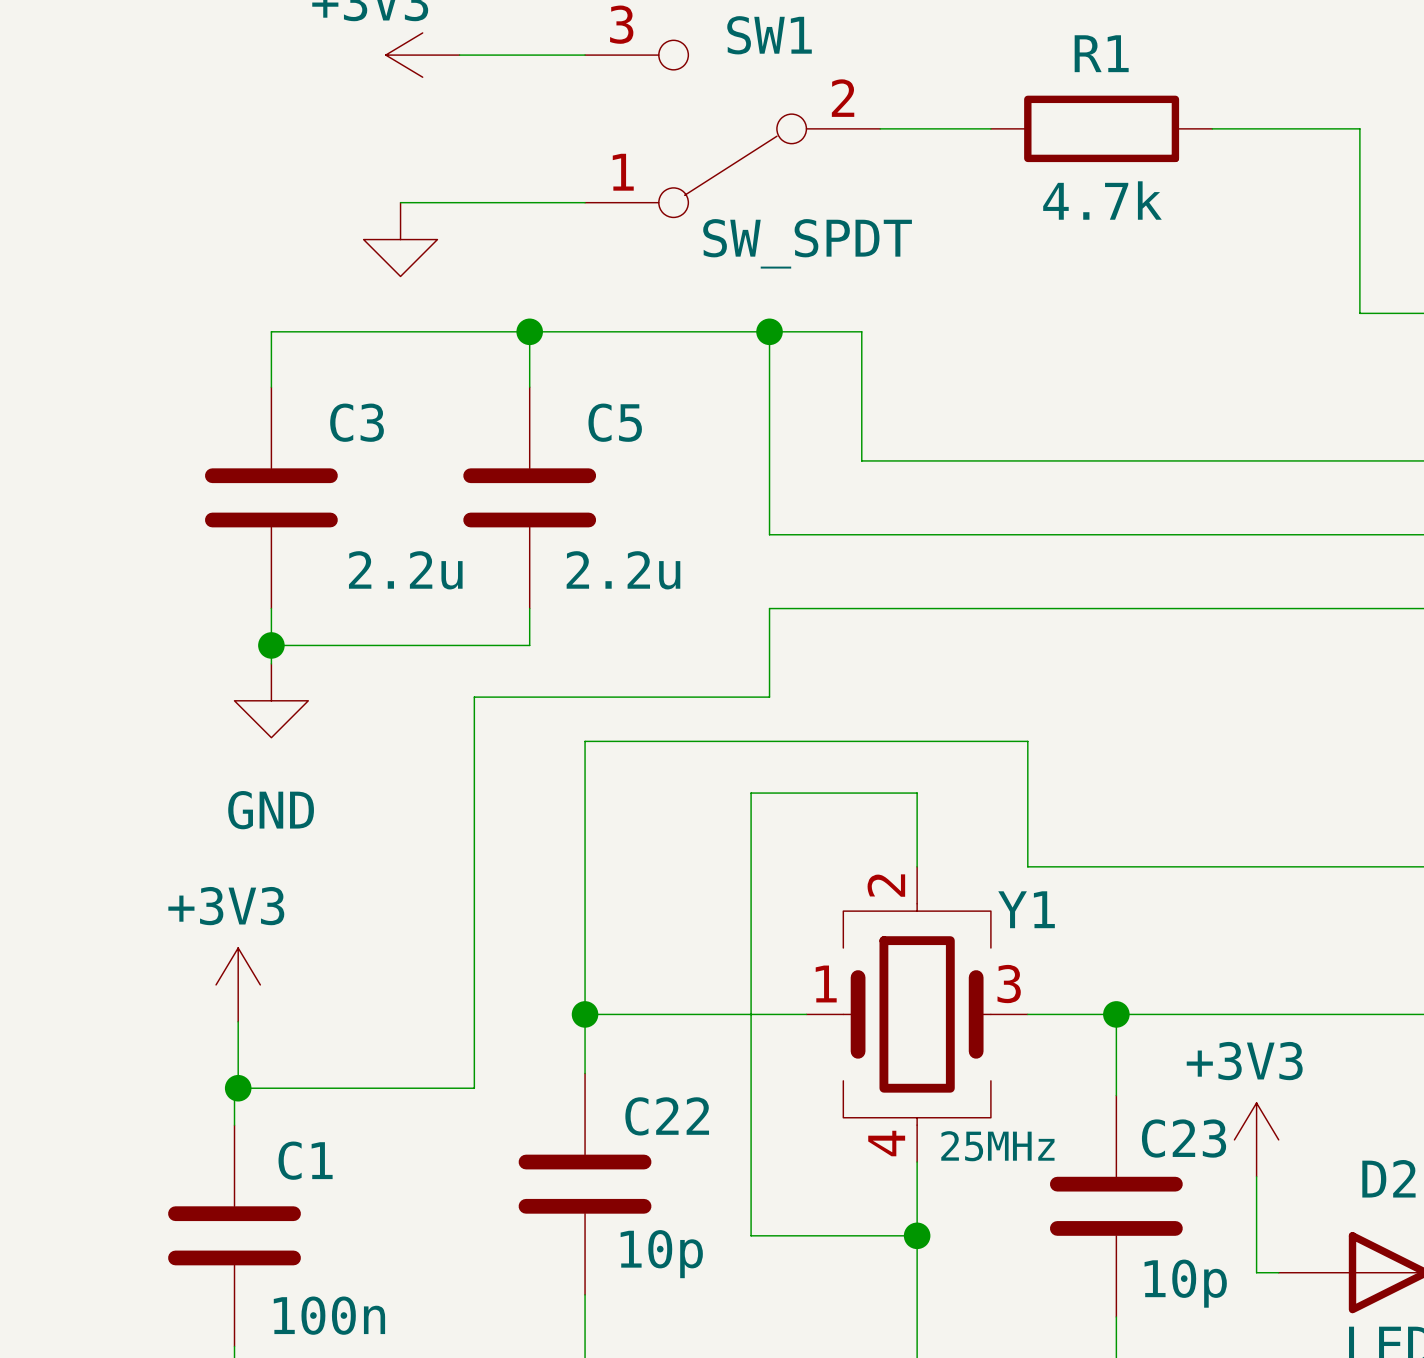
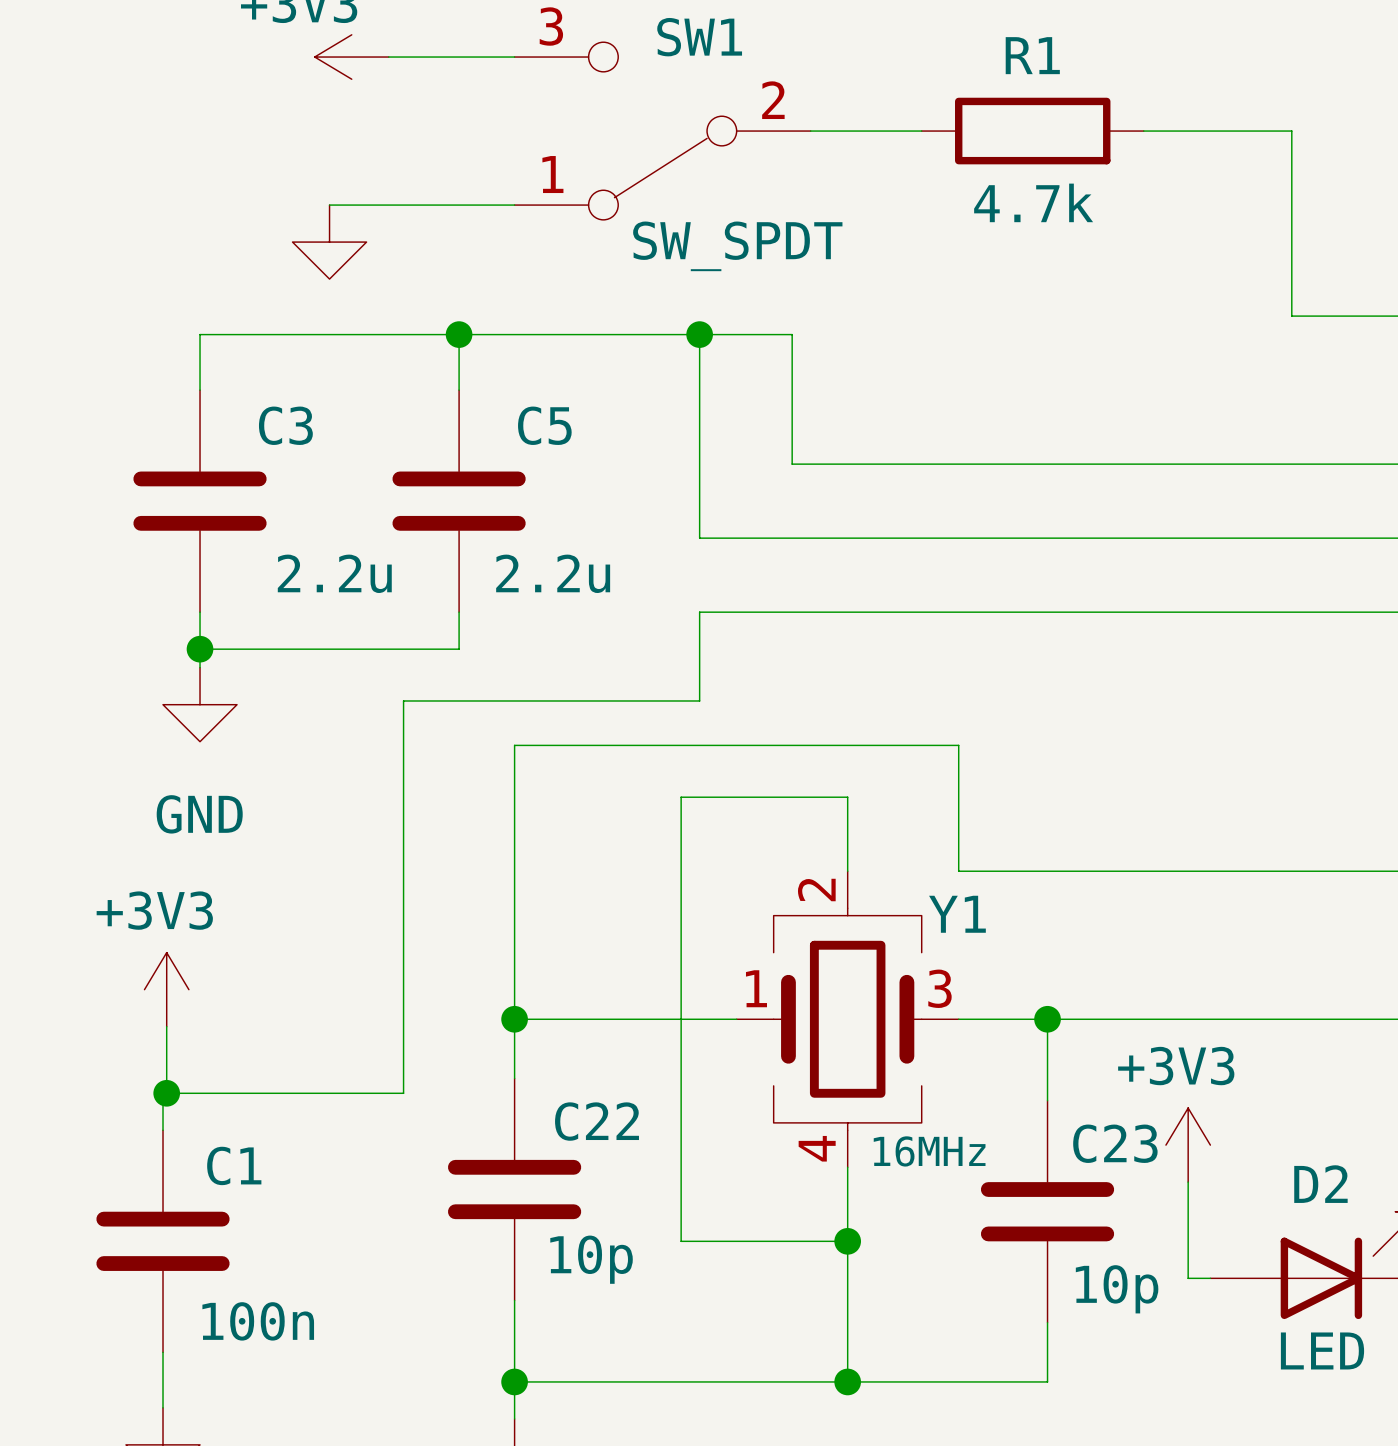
Y1 value: 25MHz (997, 1146) -> 16MHz (929, 1151)

